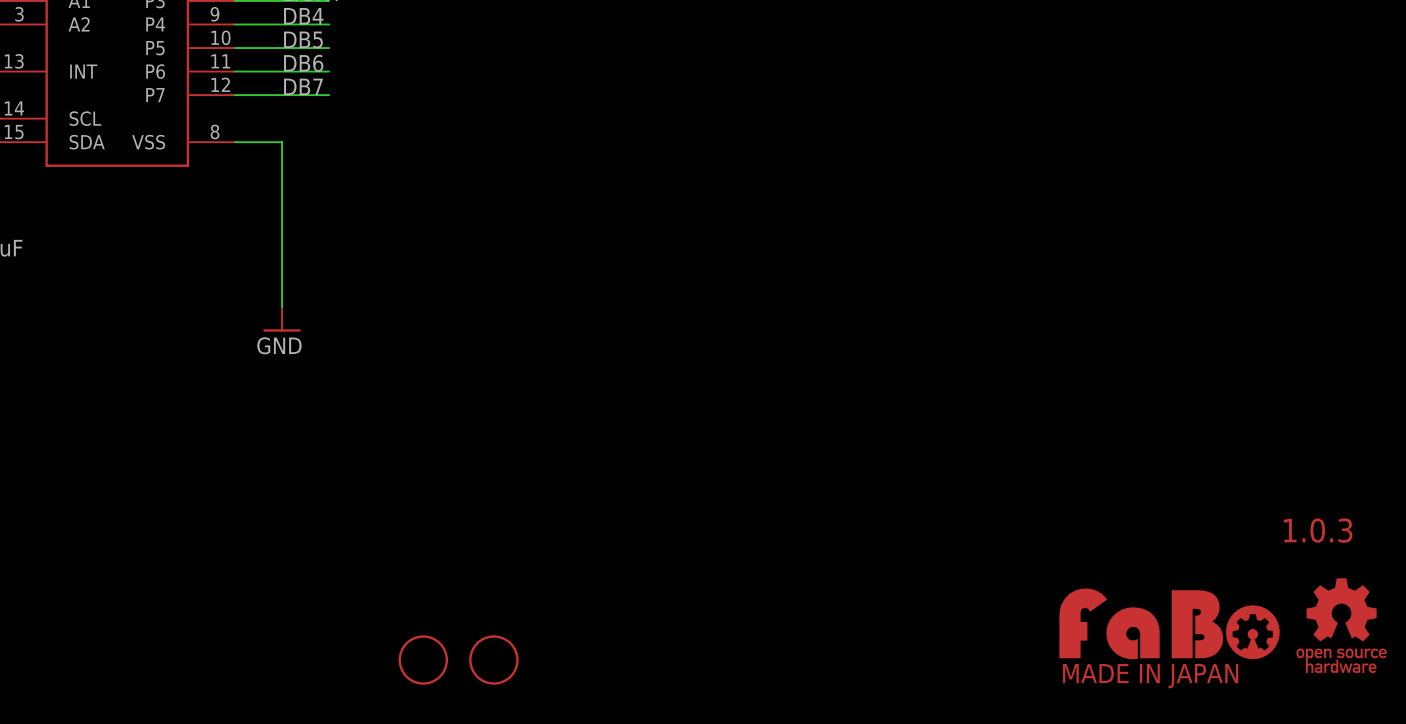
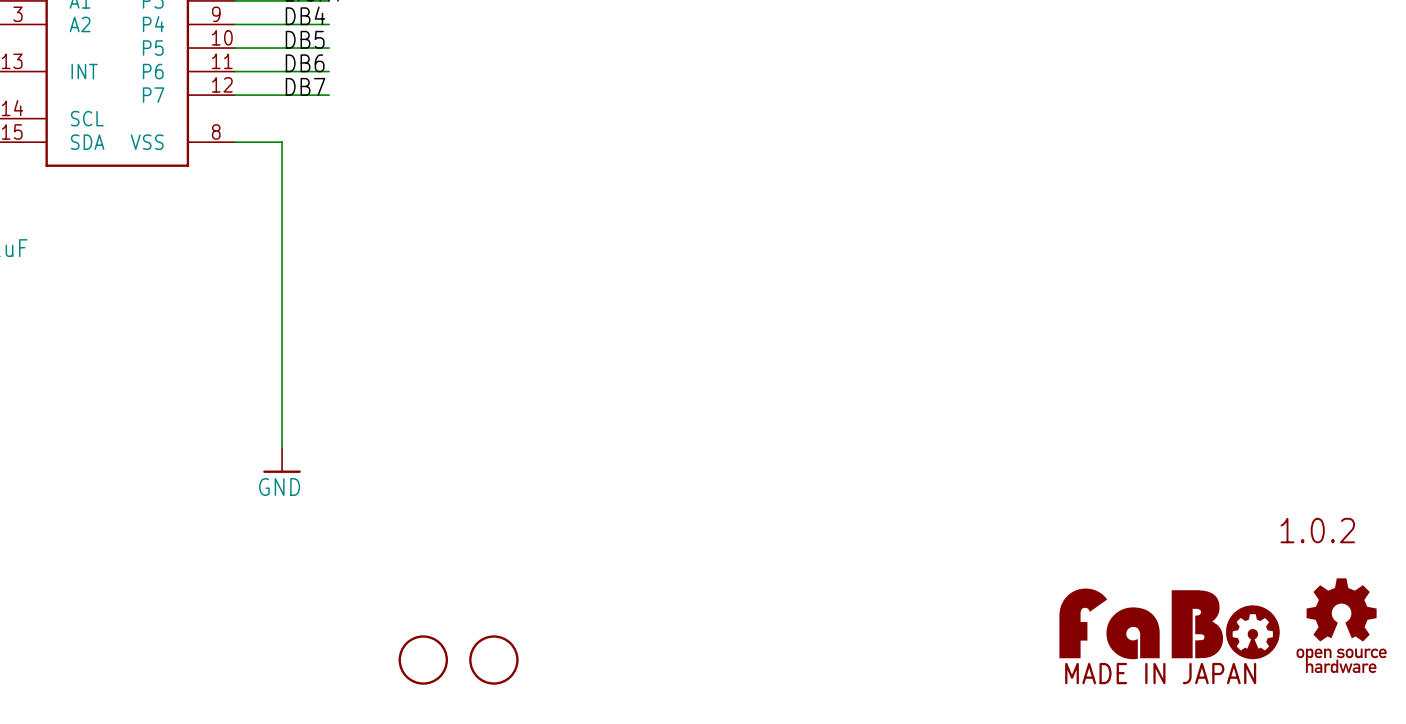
wire: none -> (282, 306) (282, 448)
power symbol position: GND (282, 319) -> GND (282, 460)
text: 1.0.3 (1318, 530) -> 1.0.2 (1317, 530)

